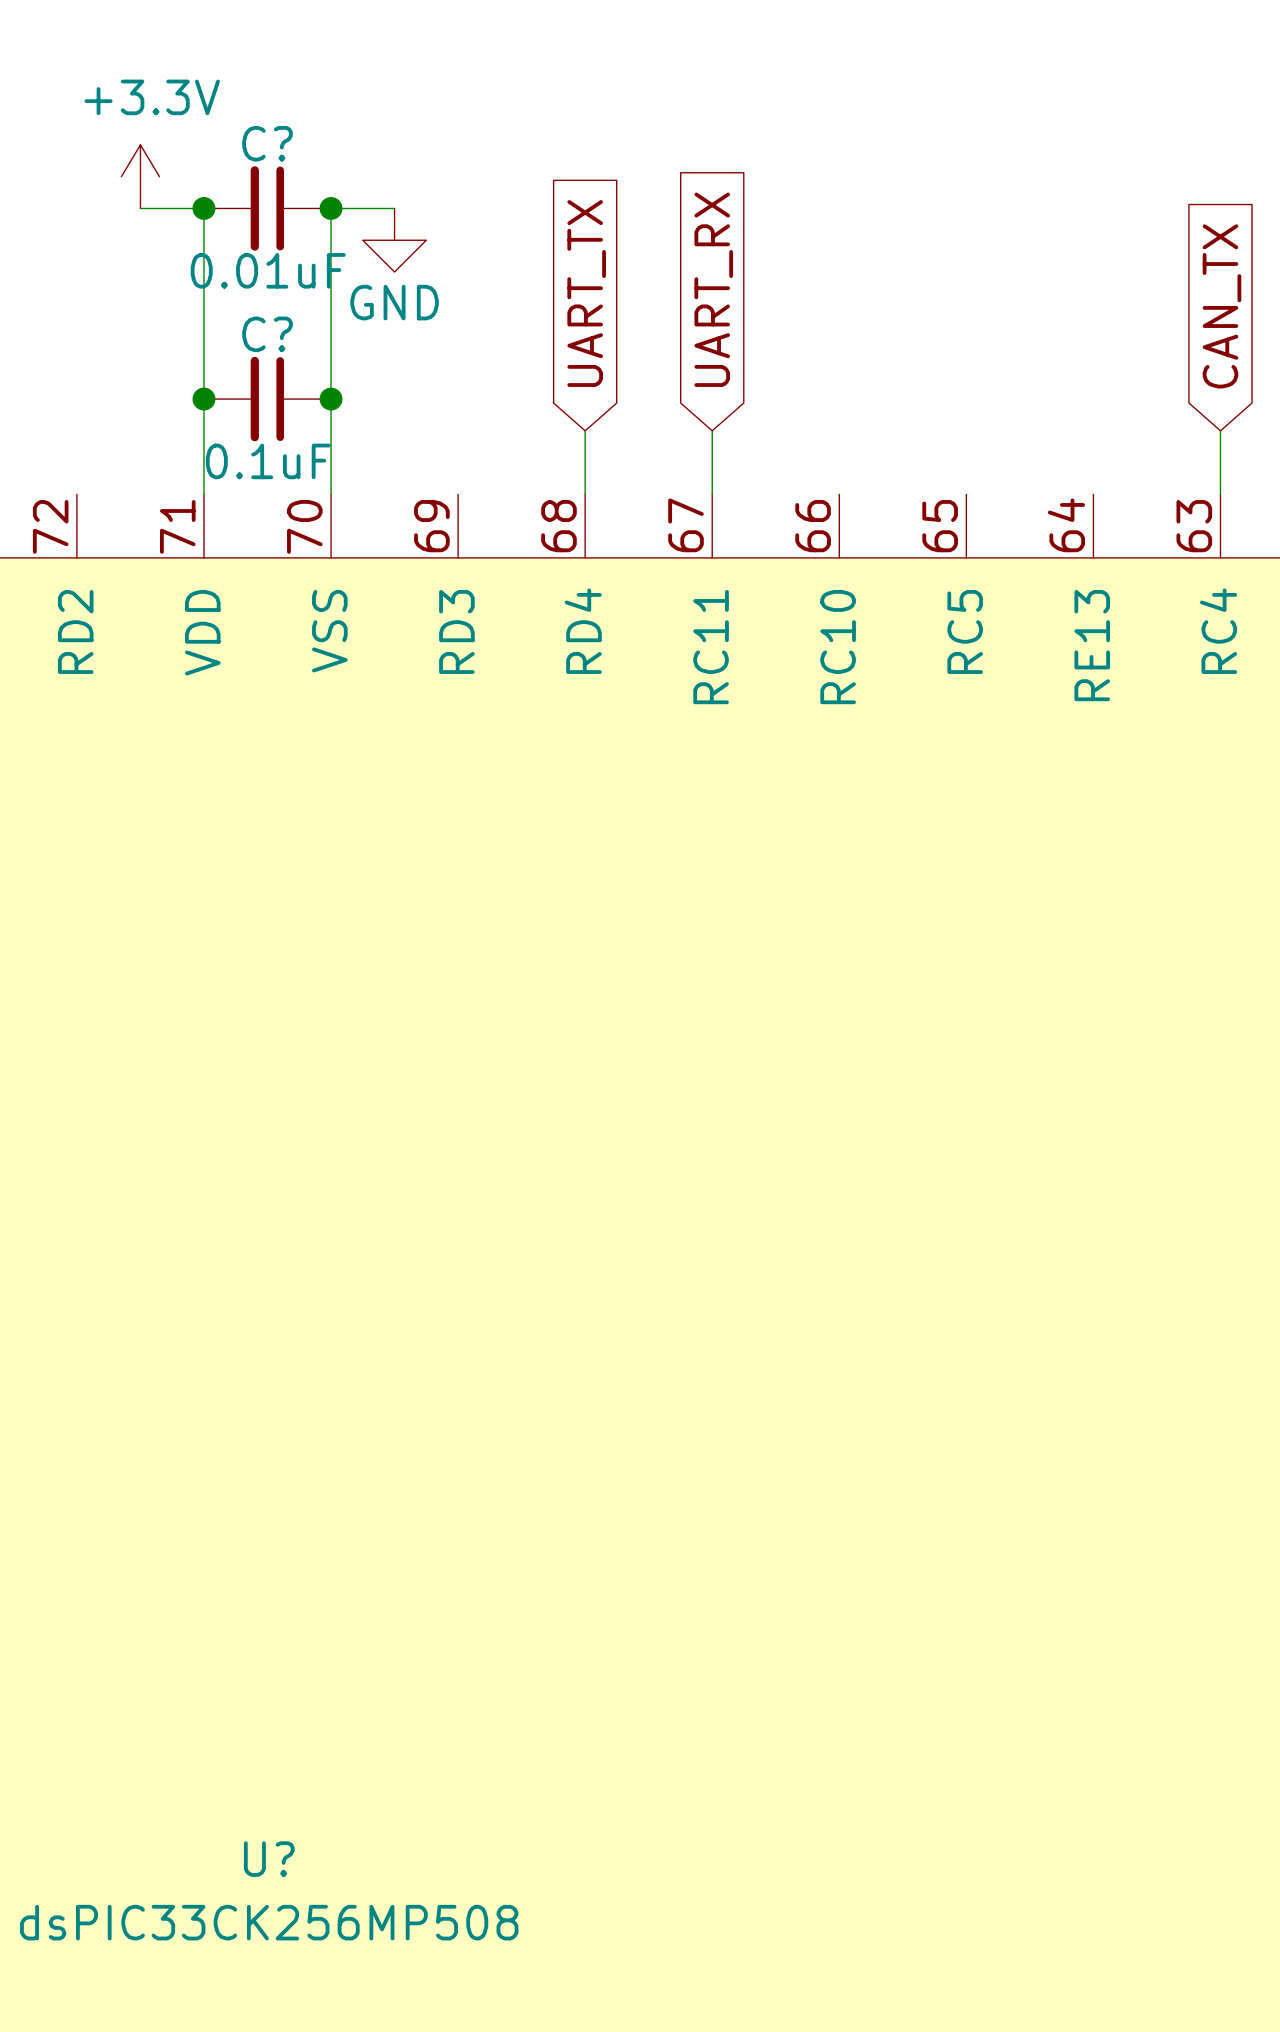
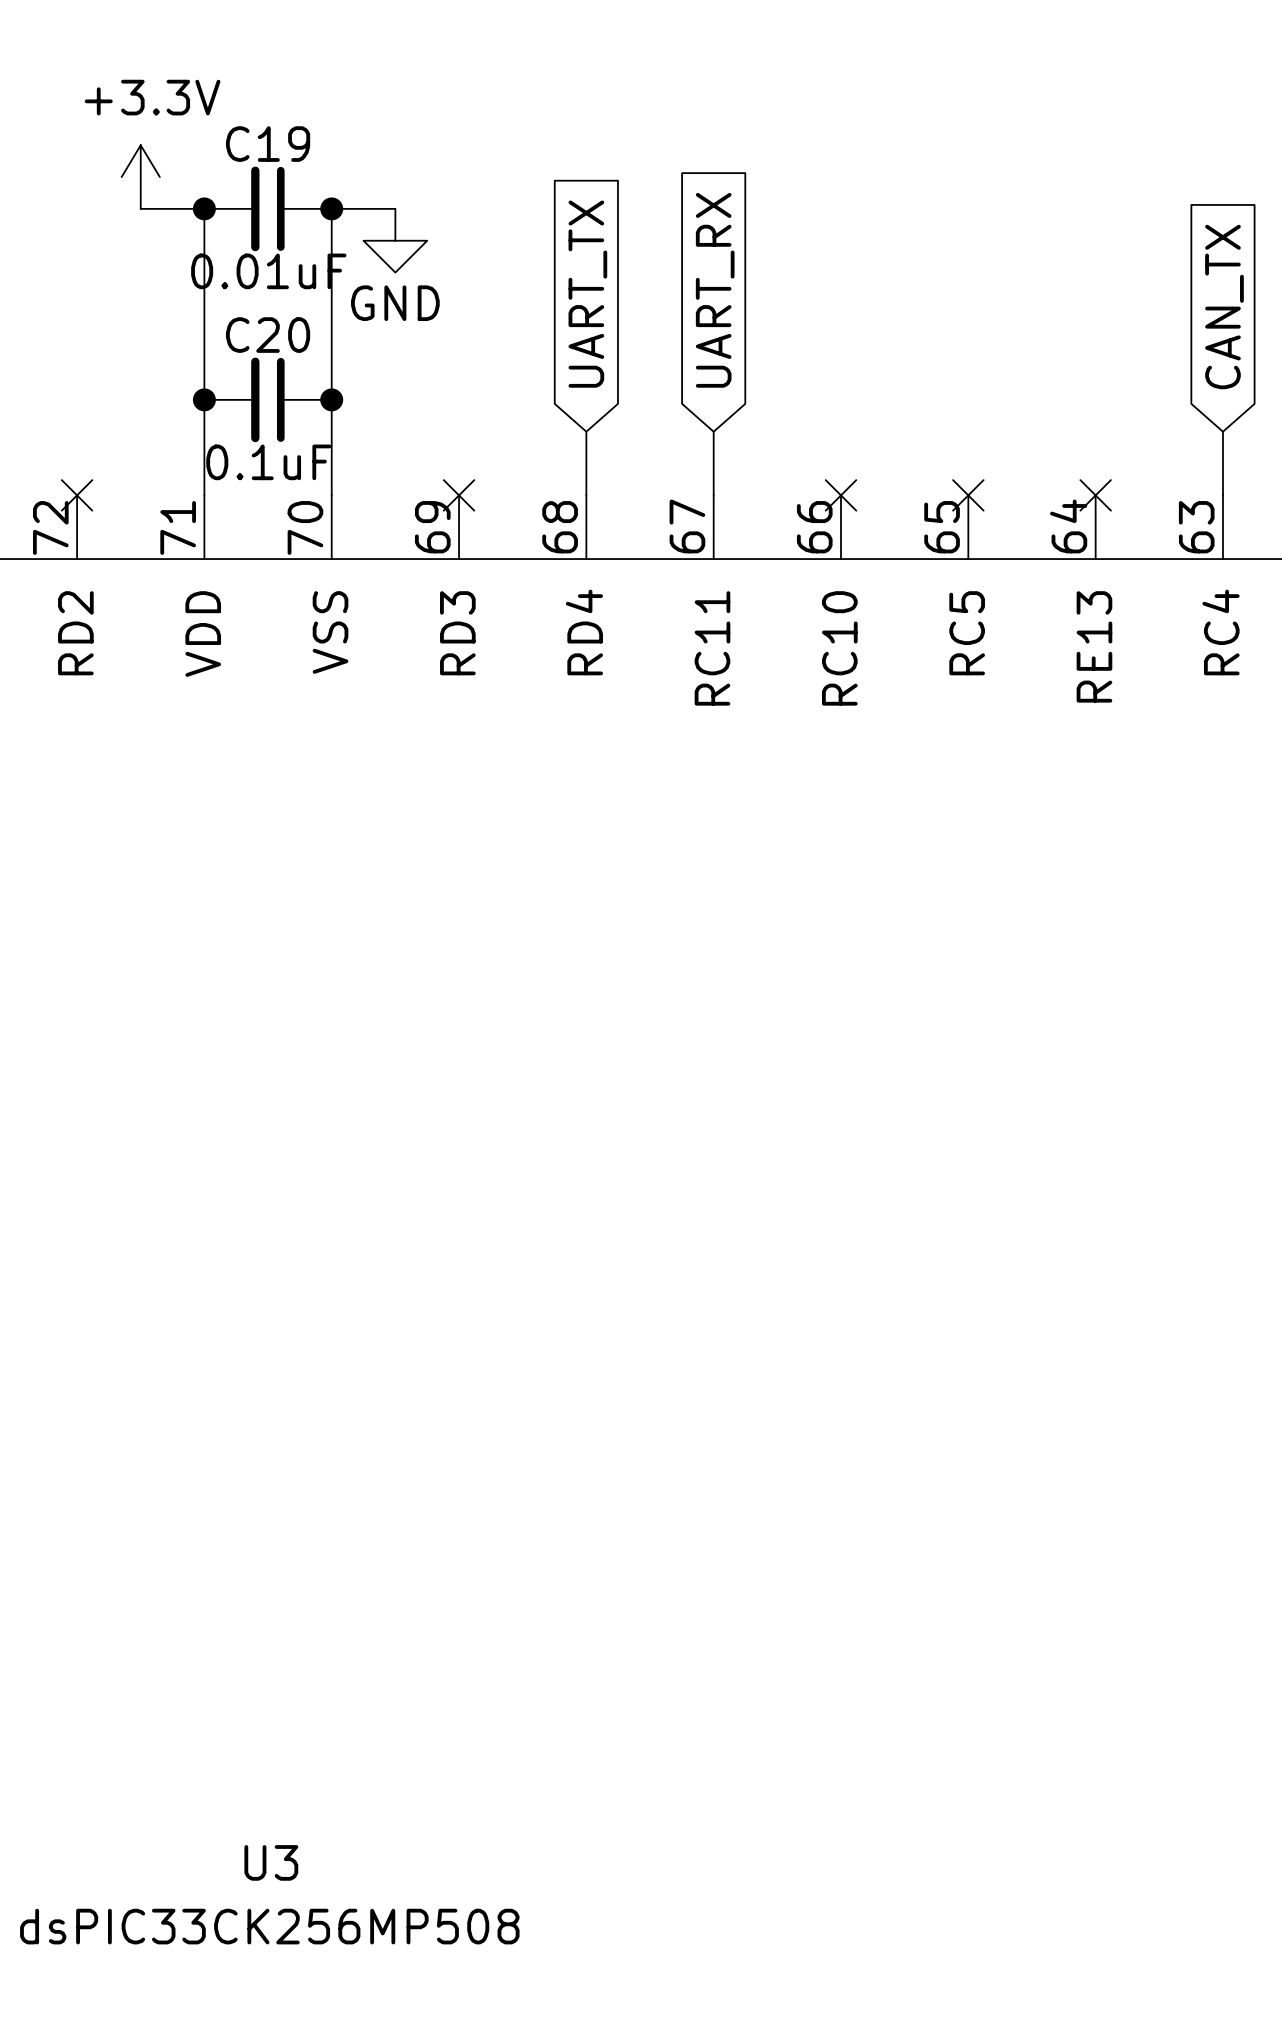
C? name: C? (267, 143) -> C19 (268, 144)
C? name: C? (267, 334) -> C20 (268, 335)
no-connect mark: none -> (77, 495)
no-connect mark: none -> (459, 495)
no-connect mark: none -> (841, 495)
no-connect mark: none -> (968, 495)
no-connect mark: none -> (1095, 495)
U? name: U? (269, 1859) -> U3 (271, 1862)

